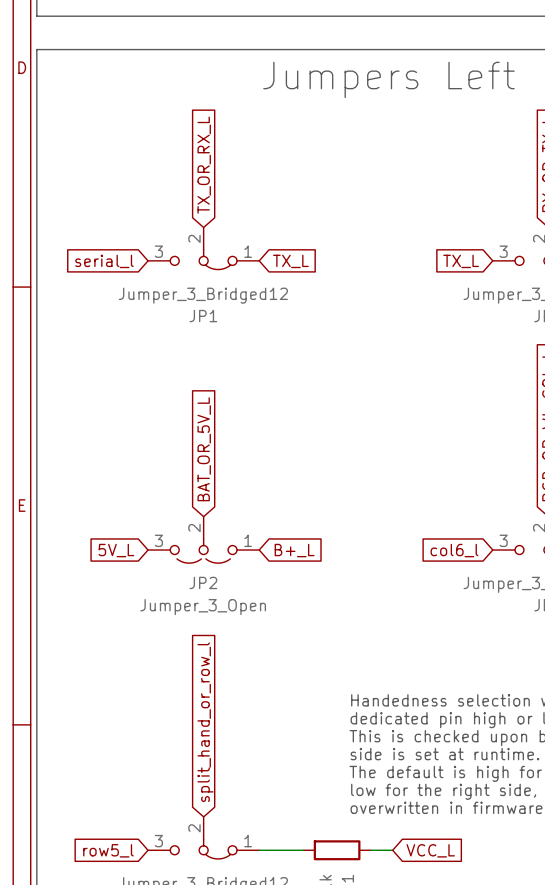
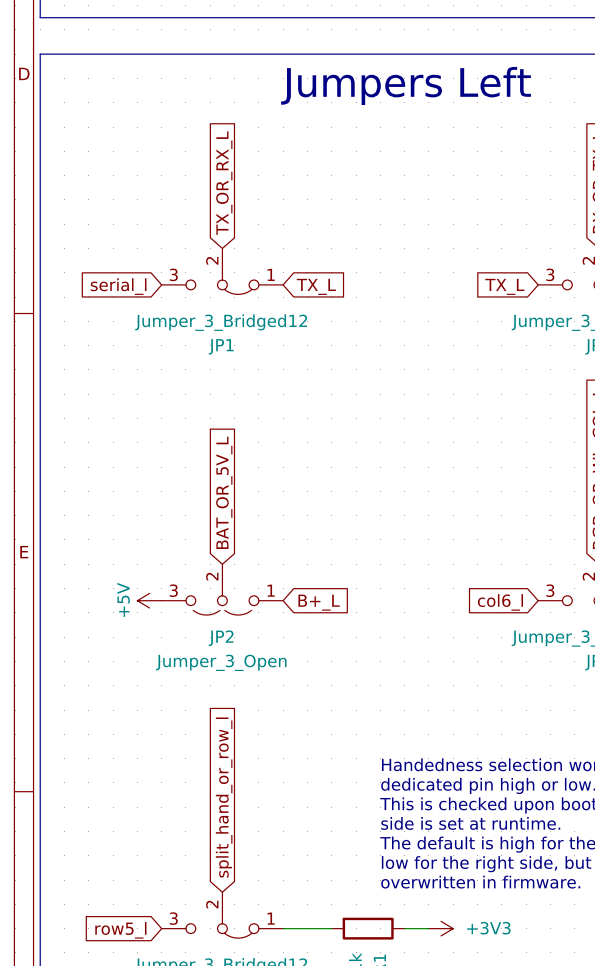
global label: 5V_L (116, 550) -> none
power symbol: none -> +5V (149, 600)
power symbol: none -> +3V3 (441, 928)
global label: VCC_L (430, 850) -> none

